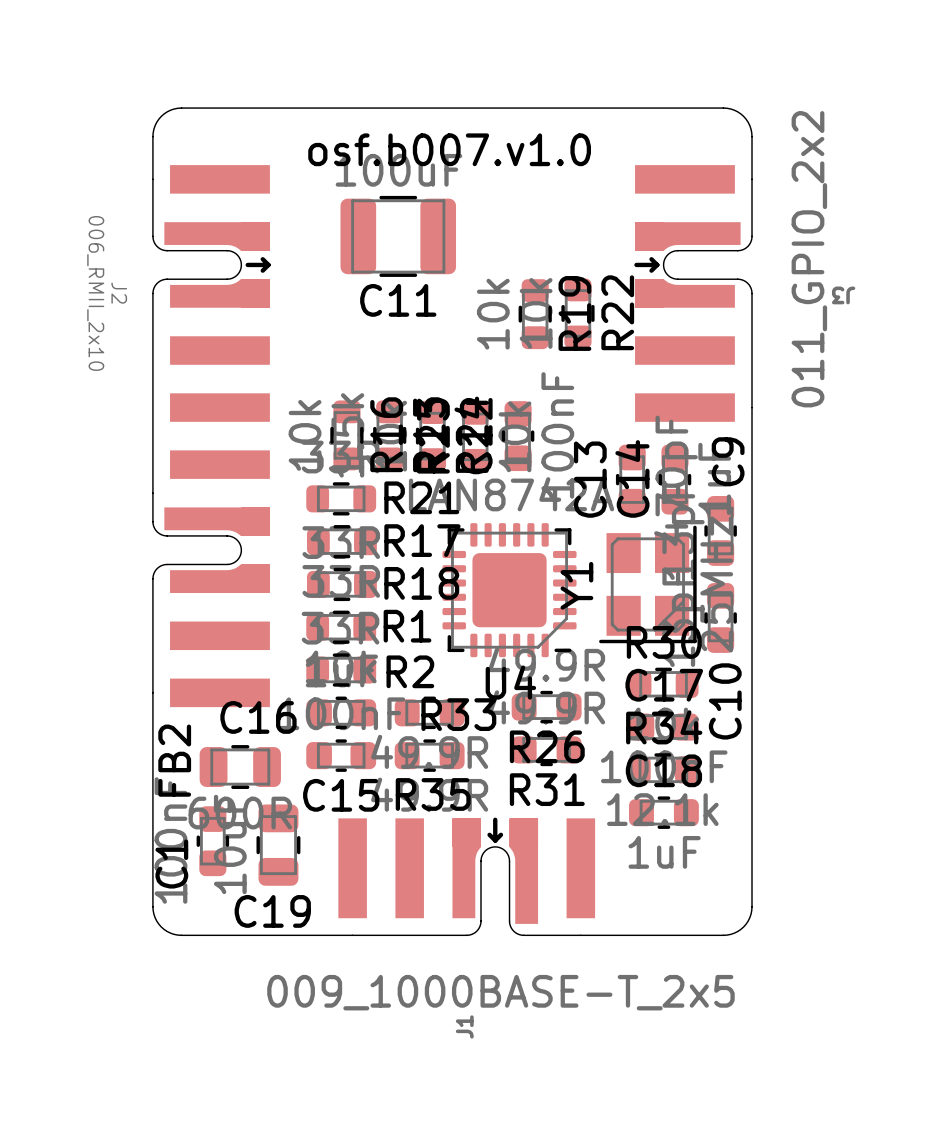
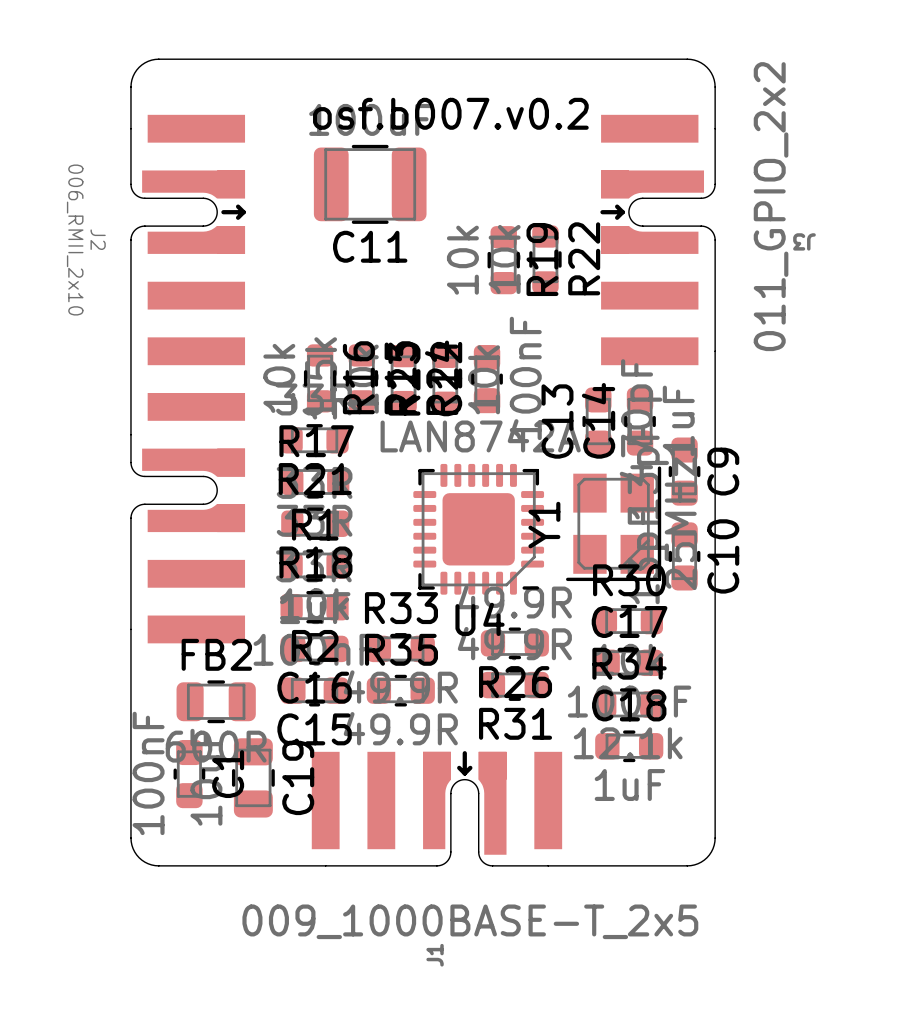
text: osf.b007.v1.0 (449, 149) -> osf.b007.v0.2 (450, 113)
C9 name position: C9 (728, 461) -> C9 (723, 471)
R21 name position: R21 (421, 497) -> R21 (315, 479)
R17 name position: R17 (422, 540) -> R17 (316, 441)
R18 name position: R18 (421, 583) -> R18 (315, 562)
R1 name position: R1 (407, 626) -> R1 (315, 524)
R2 name position: R2 (410, 671) -> R2 (315, 645)
C10 name position: C10 (725, 701) -> C10 (723, 556)
R33 name position: R33 (458, 714) -> R33 (401, 608)
C16 name position: C16 (258, 717) -> C16 (314, 687)
FB2 name rotation: 0° (174, 760) -> 90° clockwise (216, 654)
R35 name position: R35 (433, 794) -> R35 (401, 649)
C1 name position: C1 (171, 864) -> C1 (228, 774)
C19 name rotation: 0° (272, 911) -> 90° counterclockwise (298, 777)

